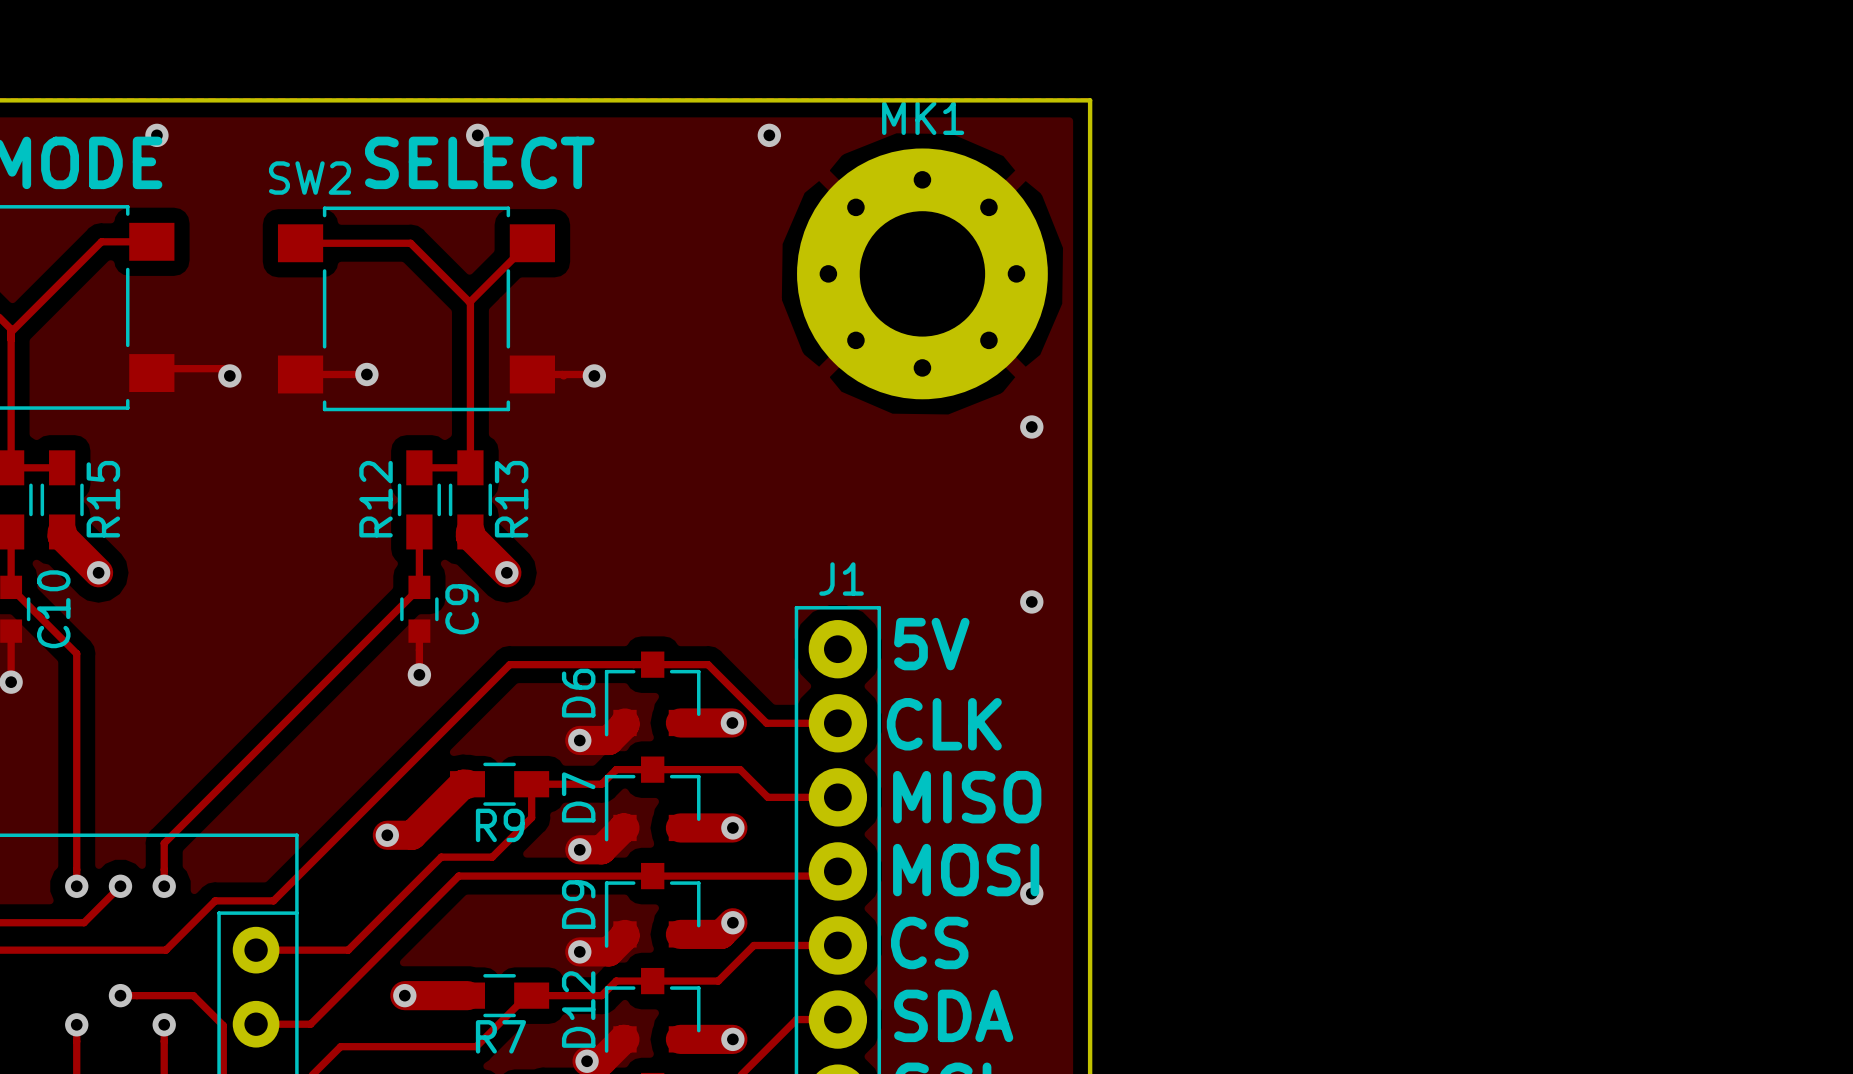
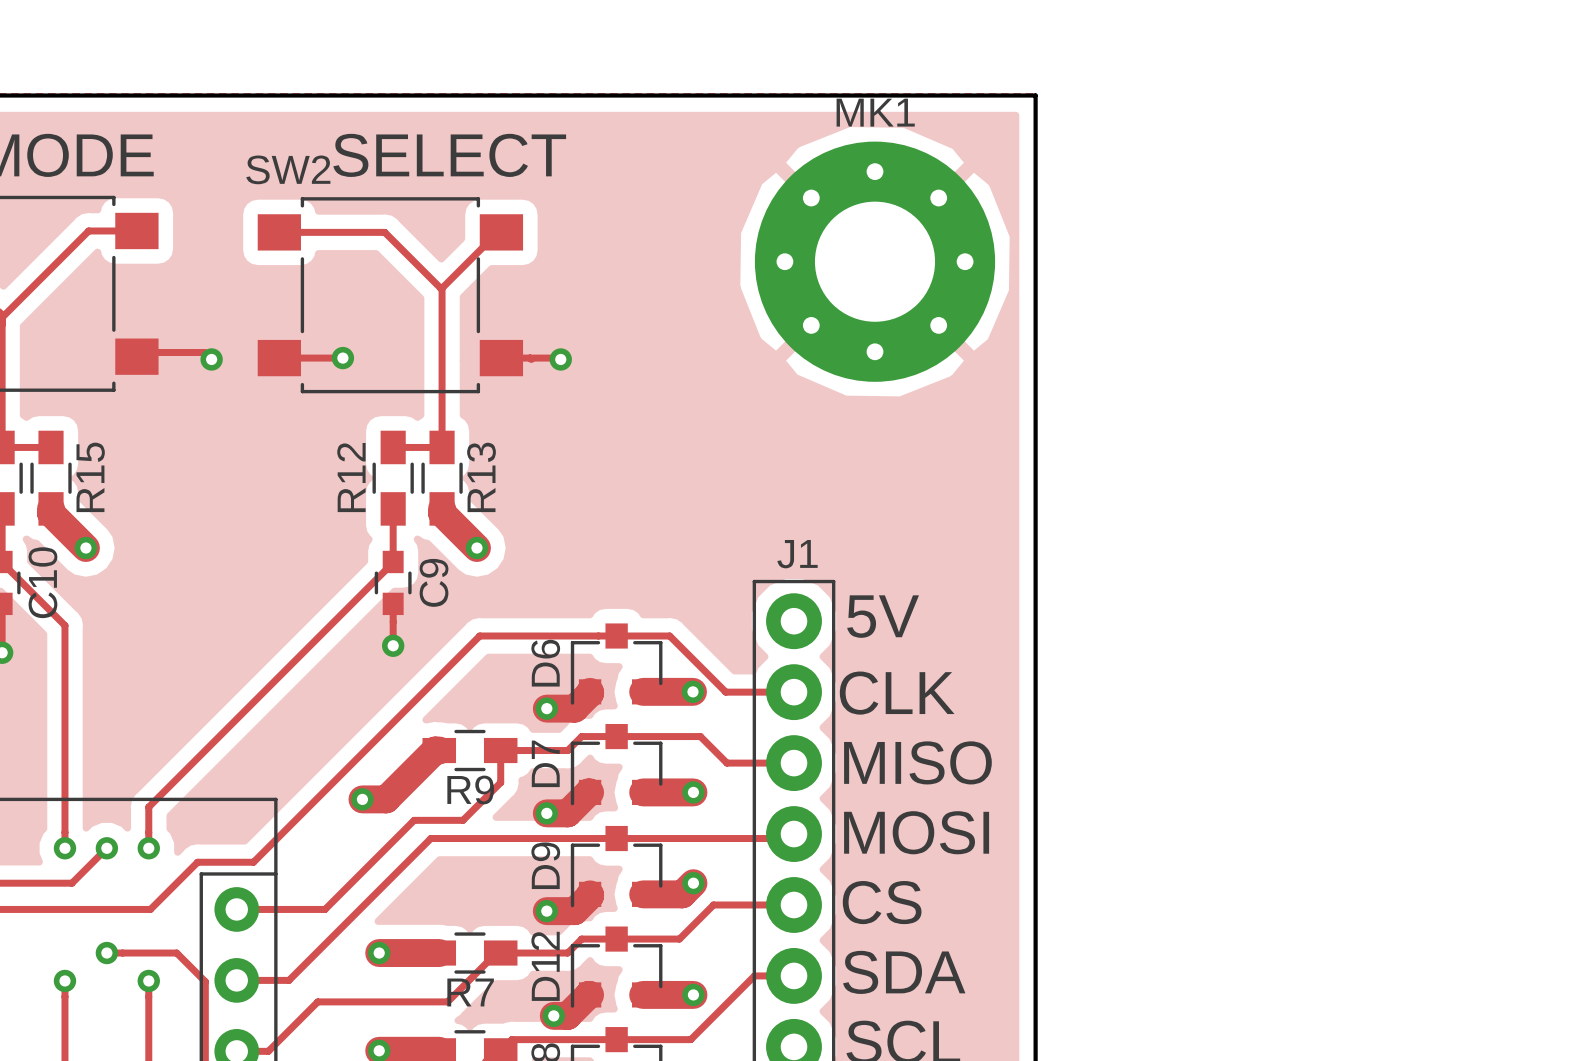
via: (156, 135) -> none
via: (477, 135) -> none
via: (769, 135) -> none
via: (1031, 426) -> none
via: (1031, 601) -> none
via: (1031, 893) -> none

